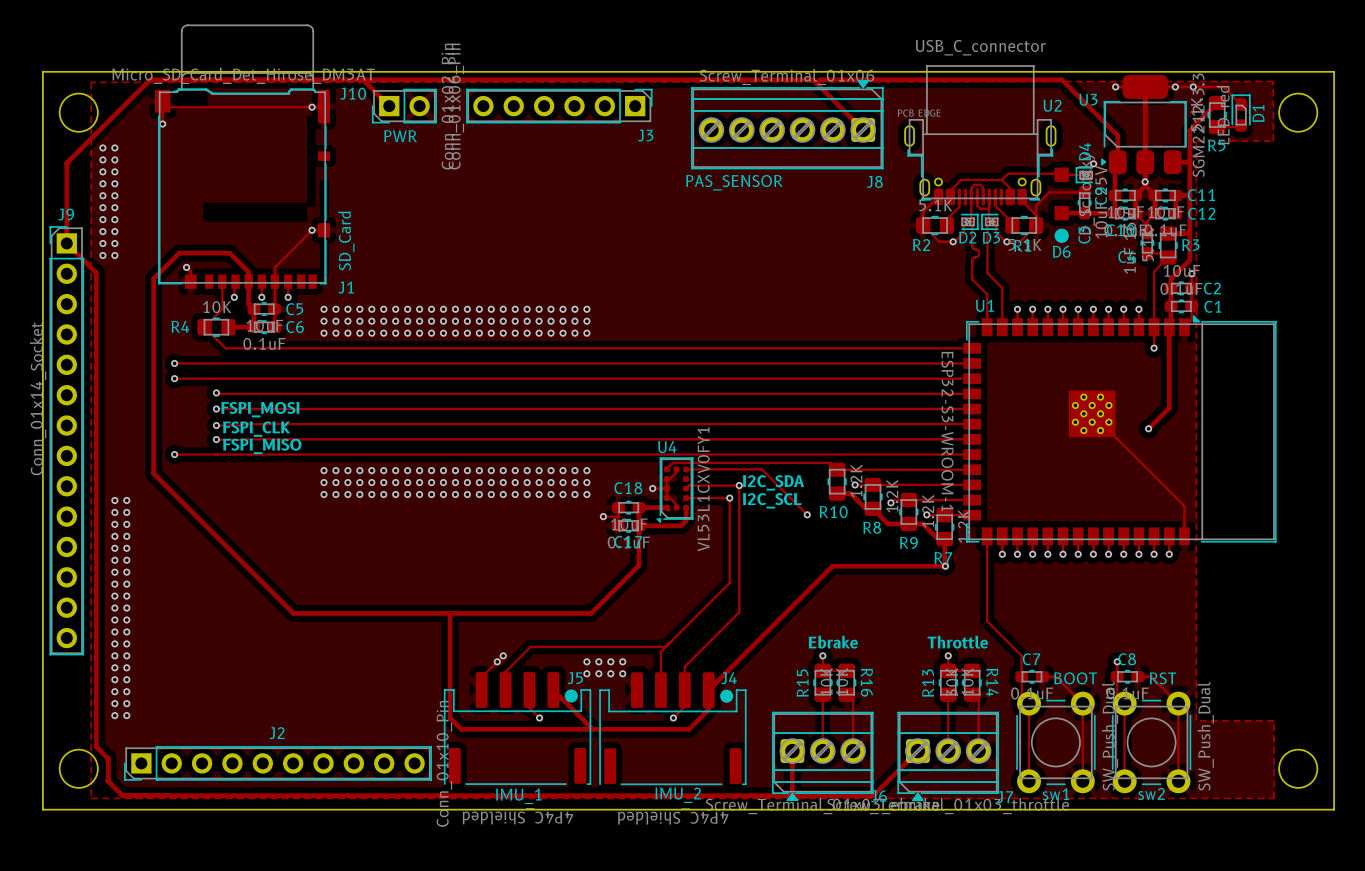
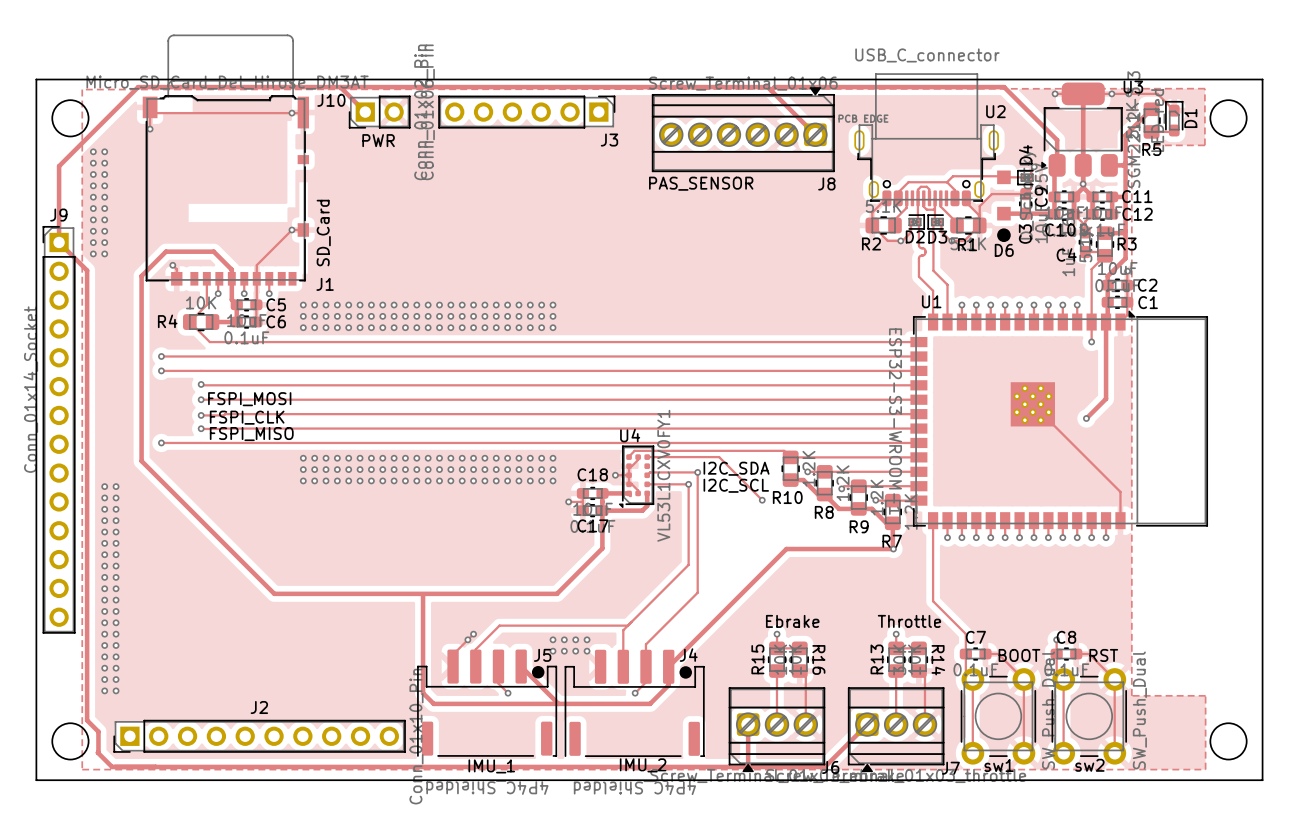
U3 name position: U3 (1088, 99) -> U3 (1133, 87)

